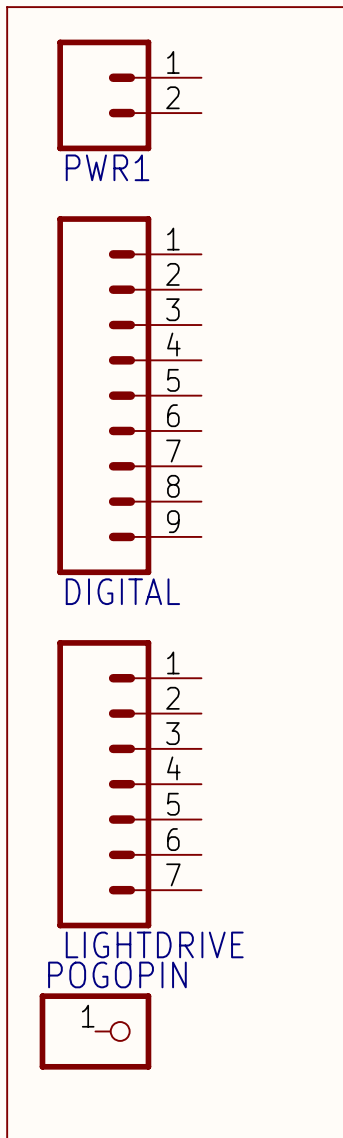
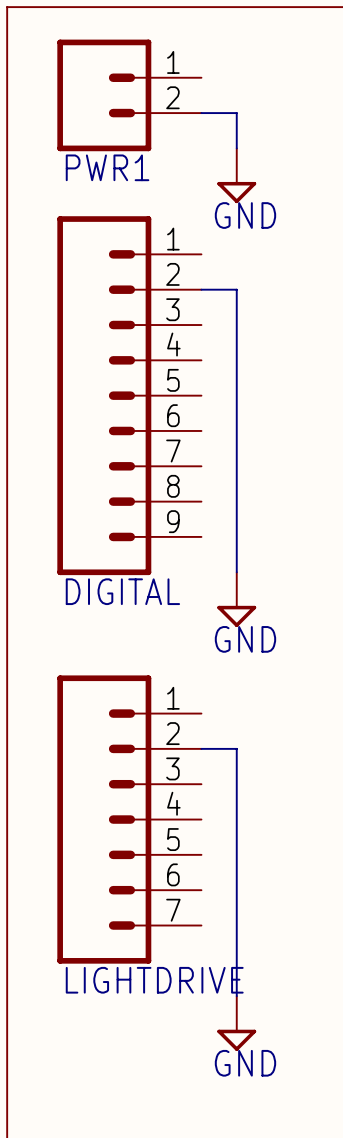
wire: none -> (201, 113) (236, 113) (236, 148)
power symbol: none -> GND (236, 175)
wire: none -> (201, 289) (236, 289) (236, 572)
power symbol: none -> GND (236, 599)
wire: none -> (201, 748) (236, 748) (236, 996)
LIGHTDRIVE position: (129, 784) -> (129, 819)
power symbol: none -> GND (236, 1023)
POGOPIN: (95, 1031) -> none

